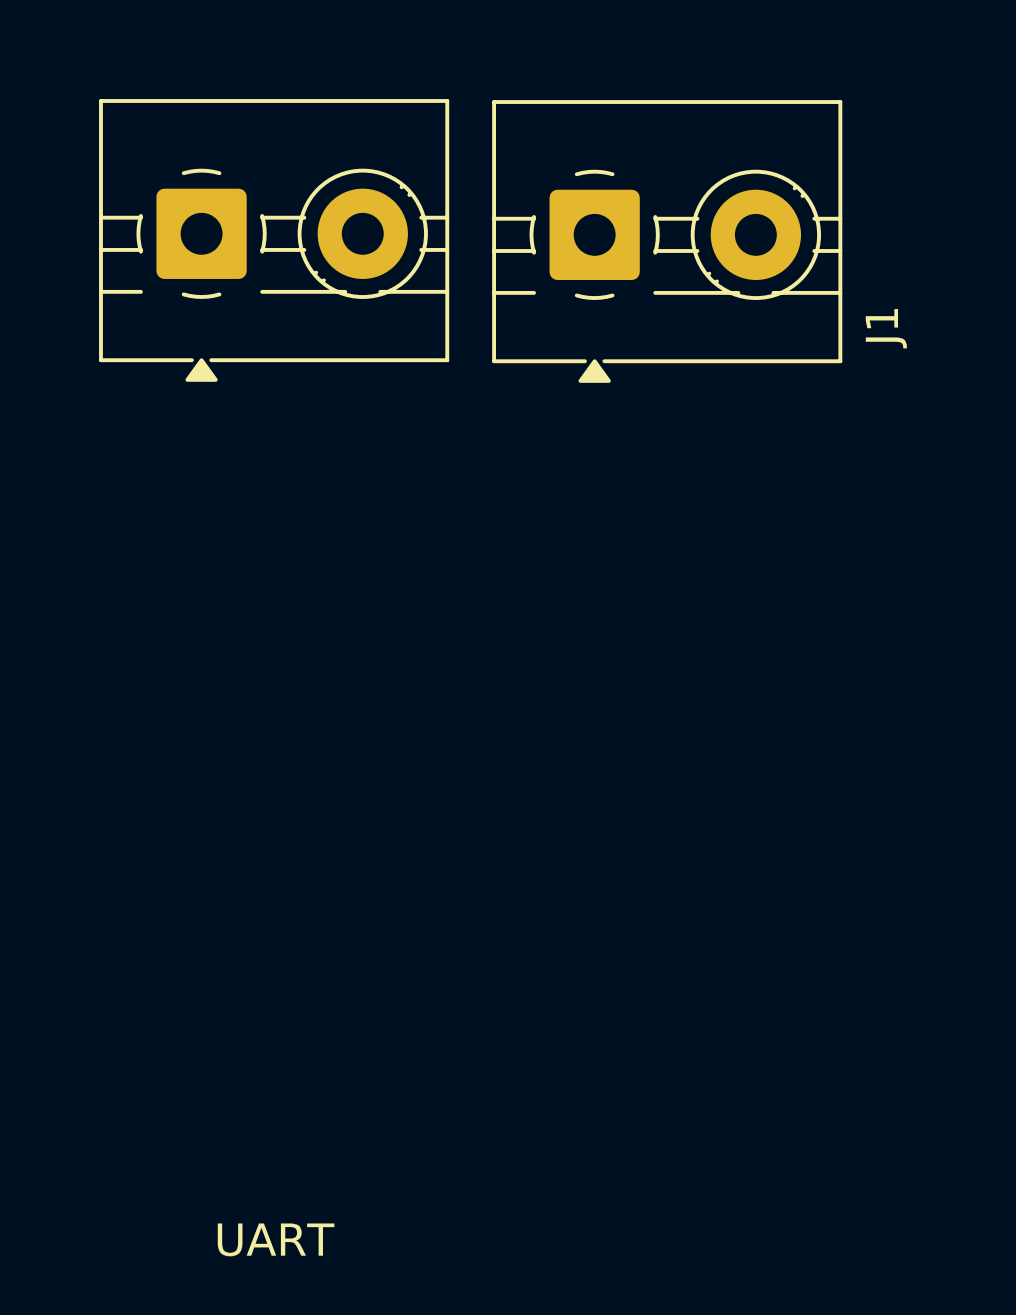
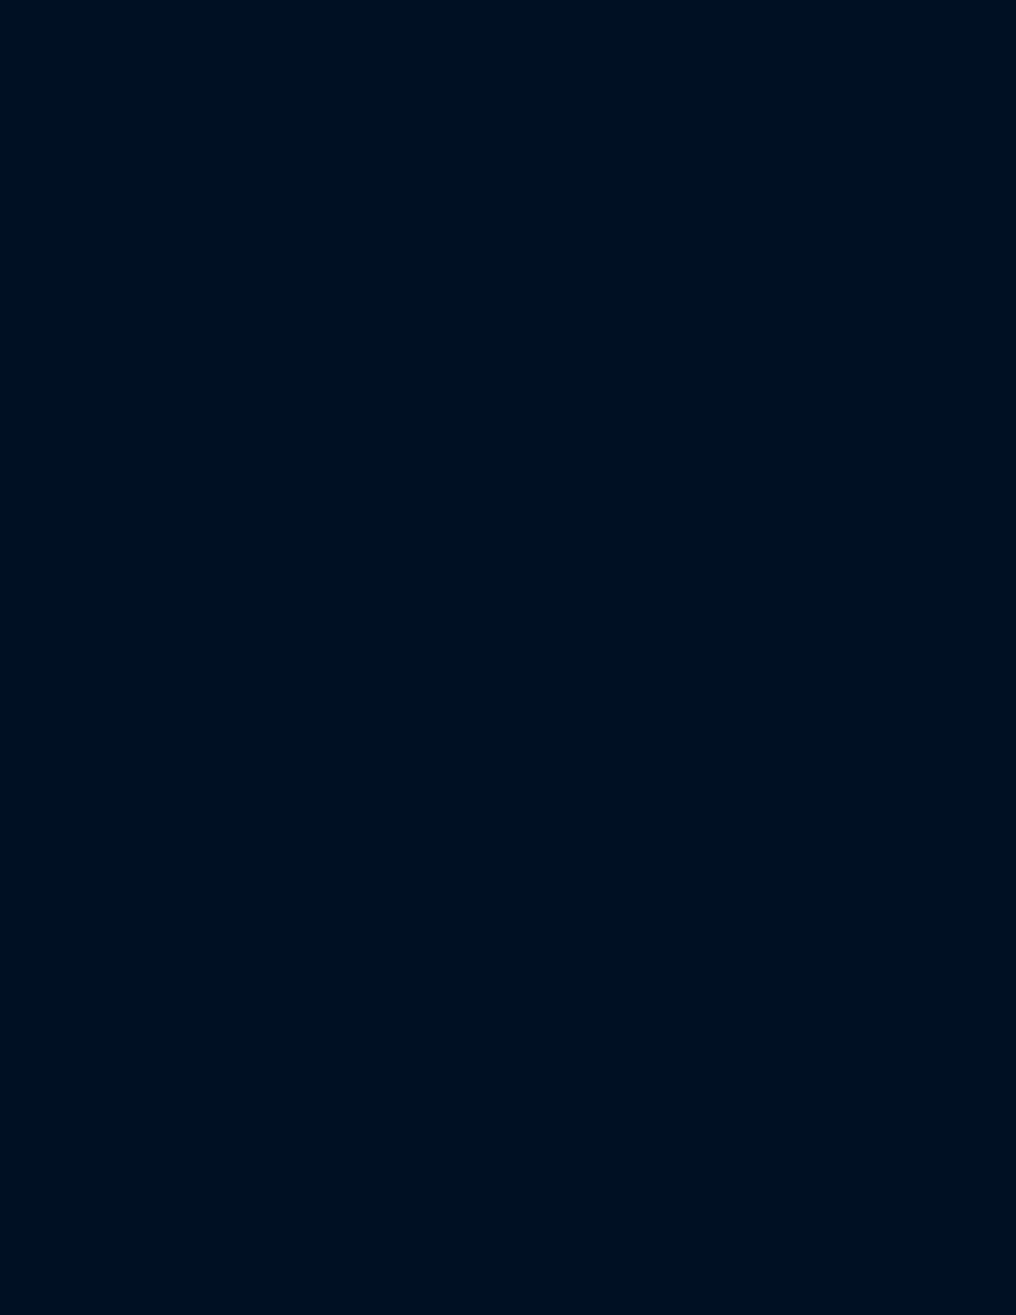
part: (274, 240) -> none
J1: (667, 241) -> none
text: UART (276, 1239) -> none

